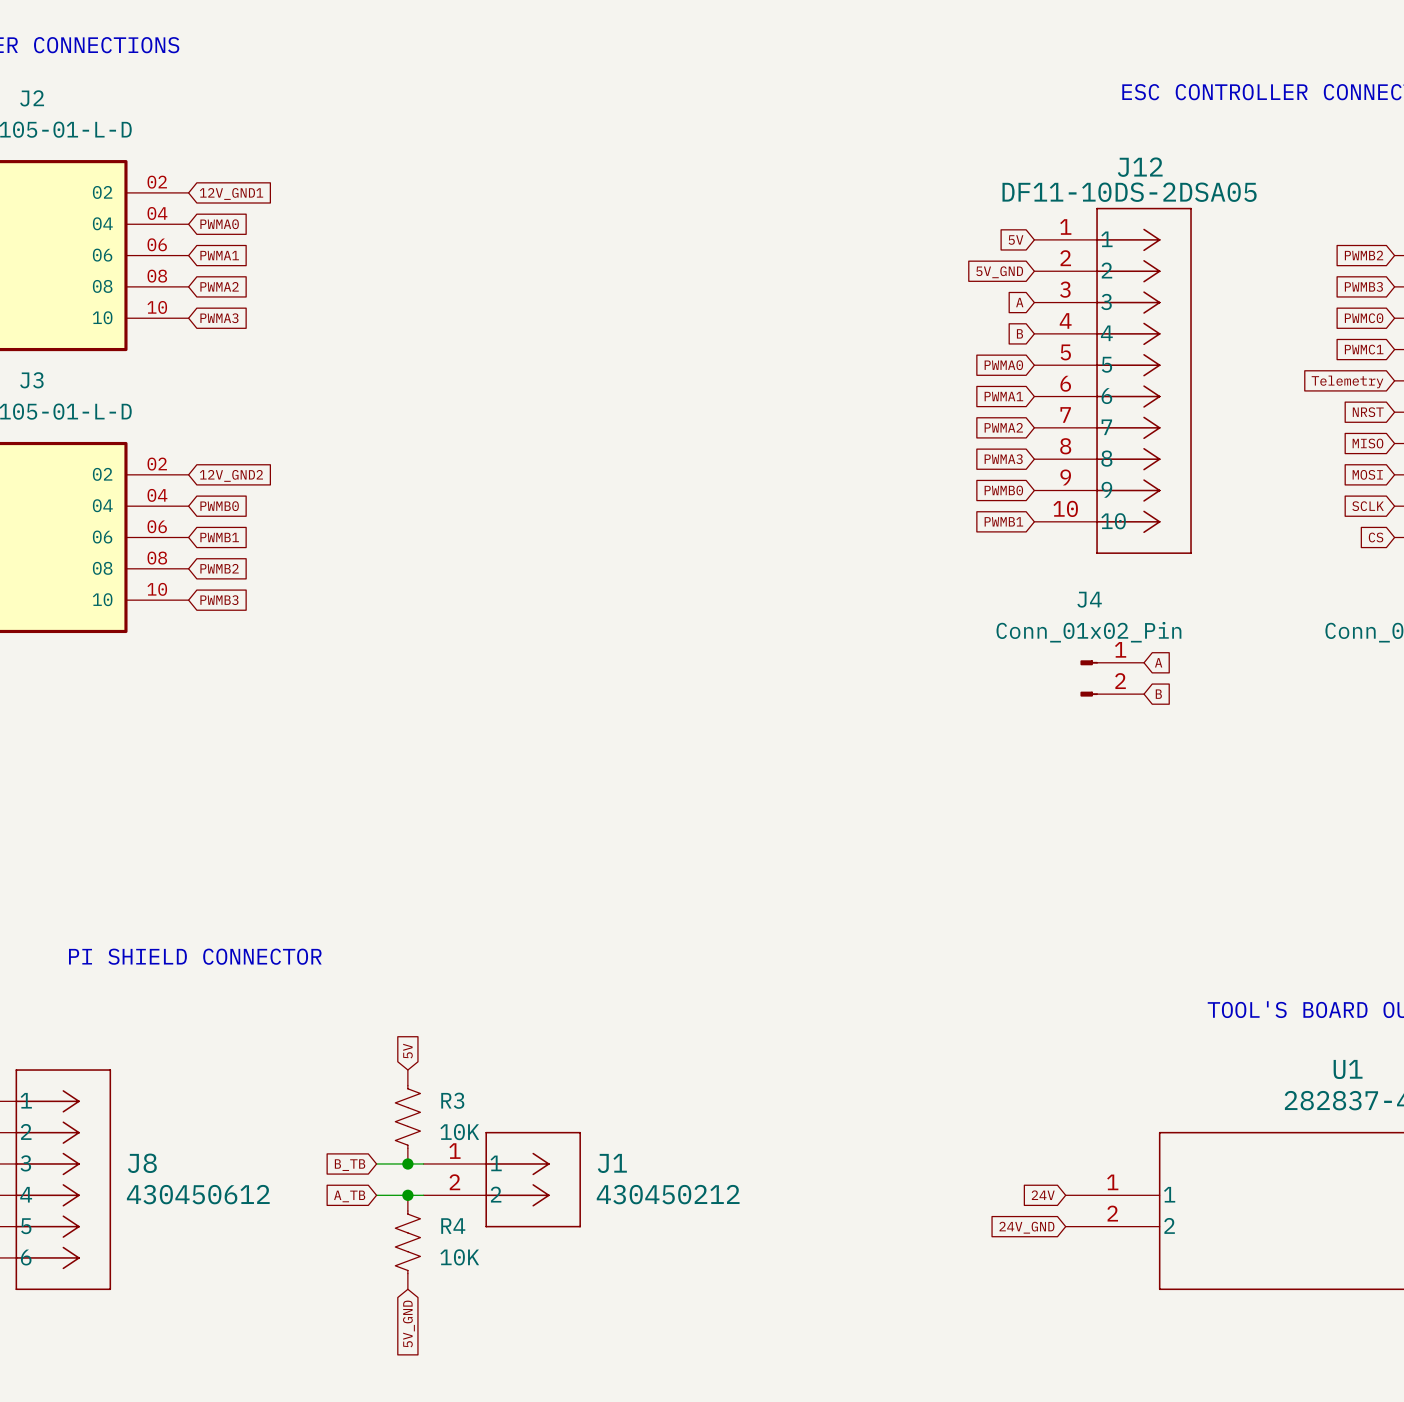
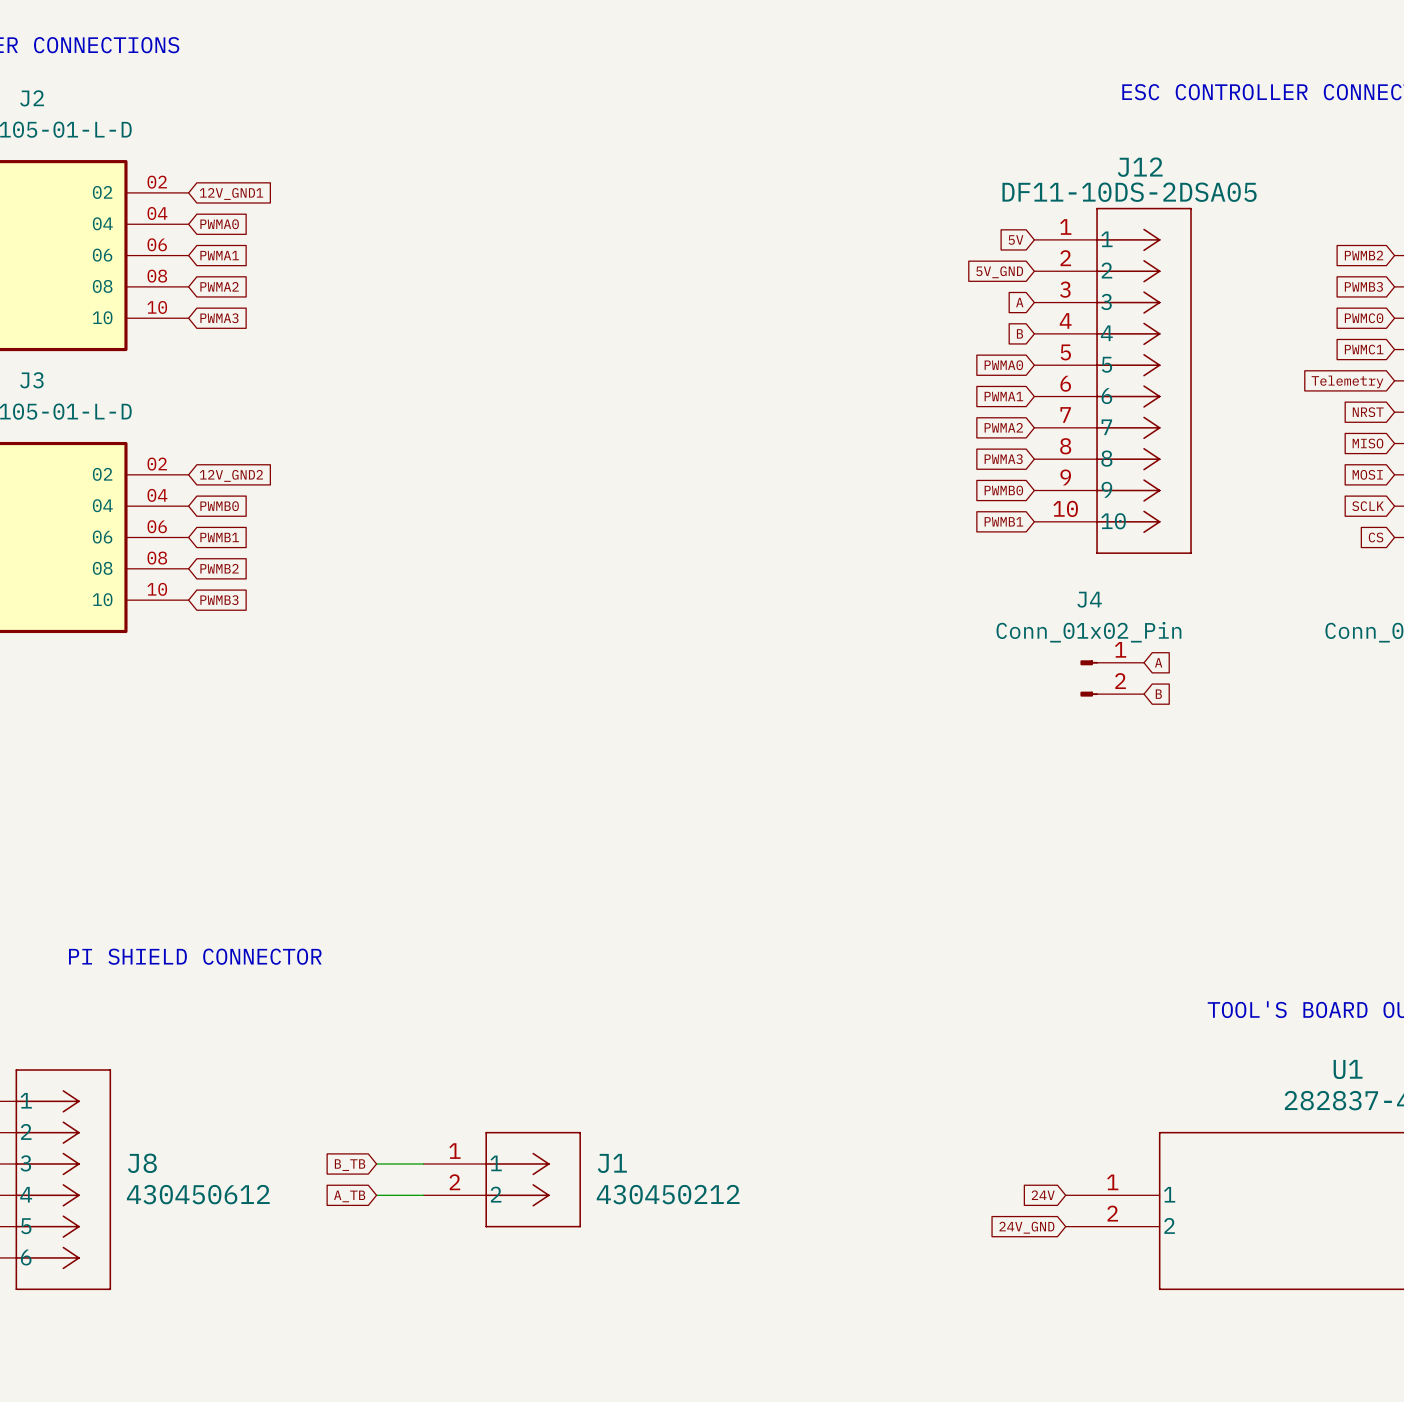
global label: 5V (407, 1051) -> none
R3: 10K (407, 1117) -> none
junction: (407, 1163) -> none
junction: (407, 1195) -> none
R4: 10K (407, 1242) -> none
global label: 5V_GND (408, 1323) -> none

